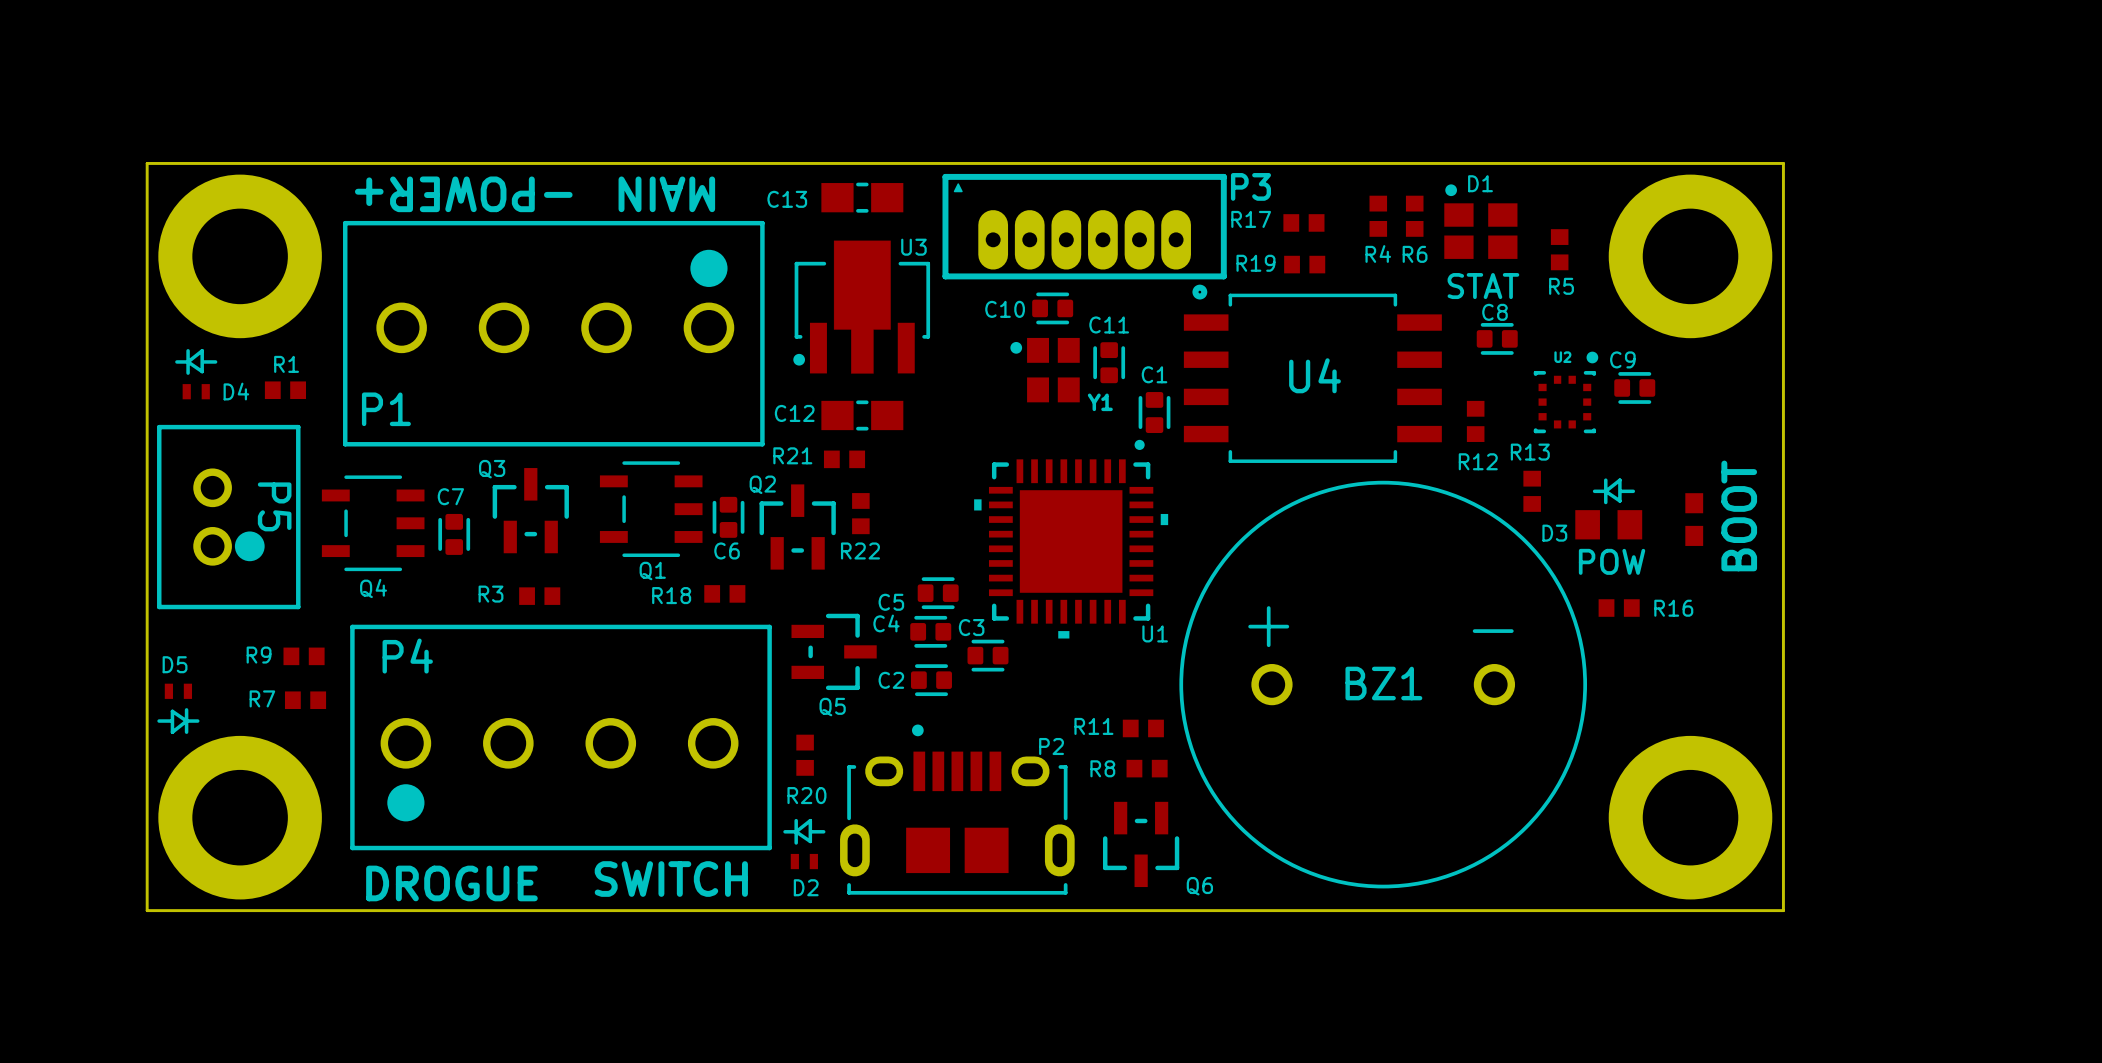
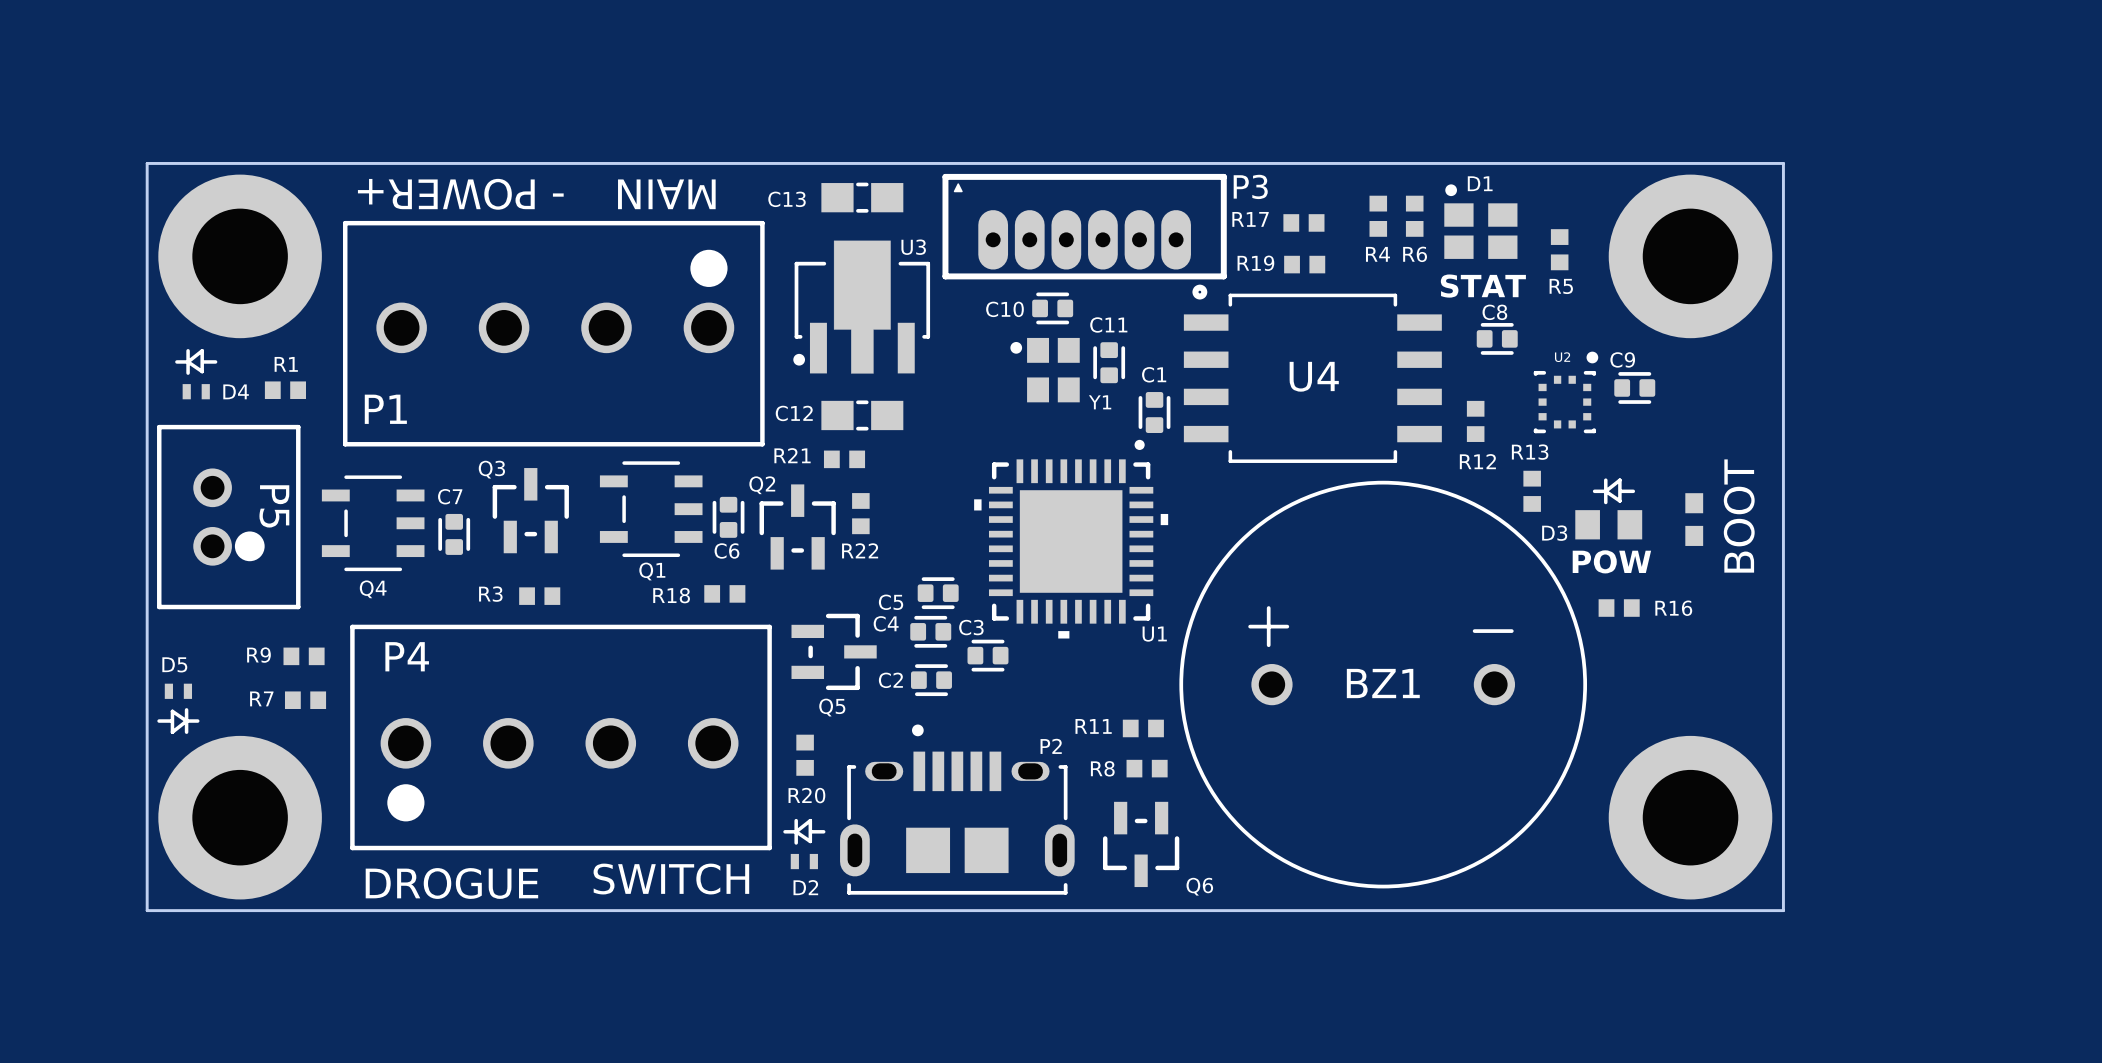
P2 footprint: [840, 724, 1075, 895] -> [840, 724, 1075, 895]

